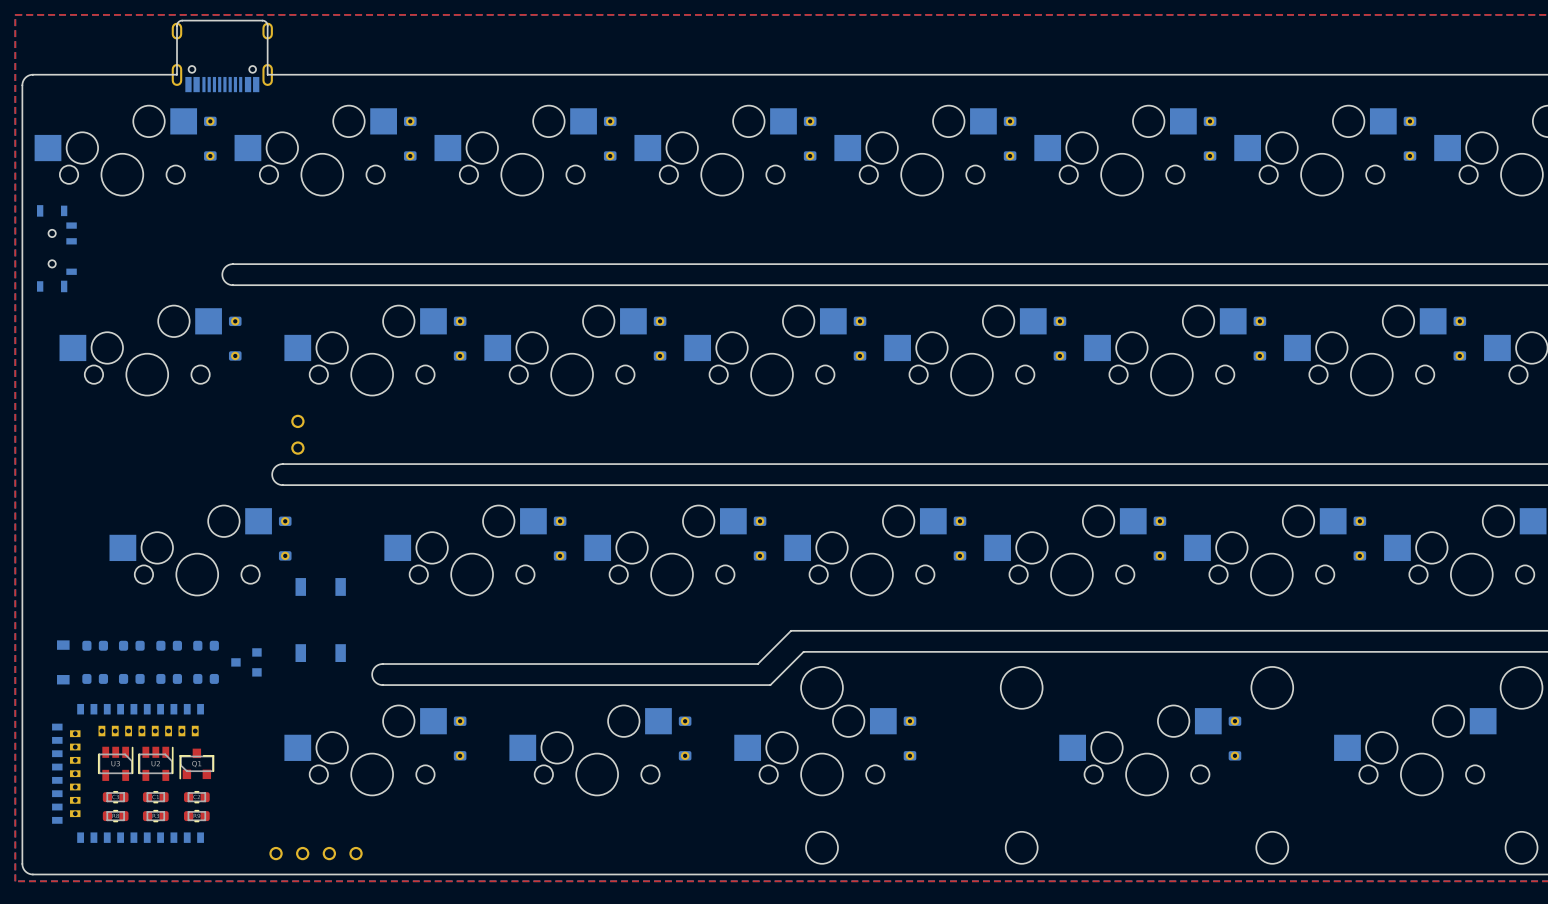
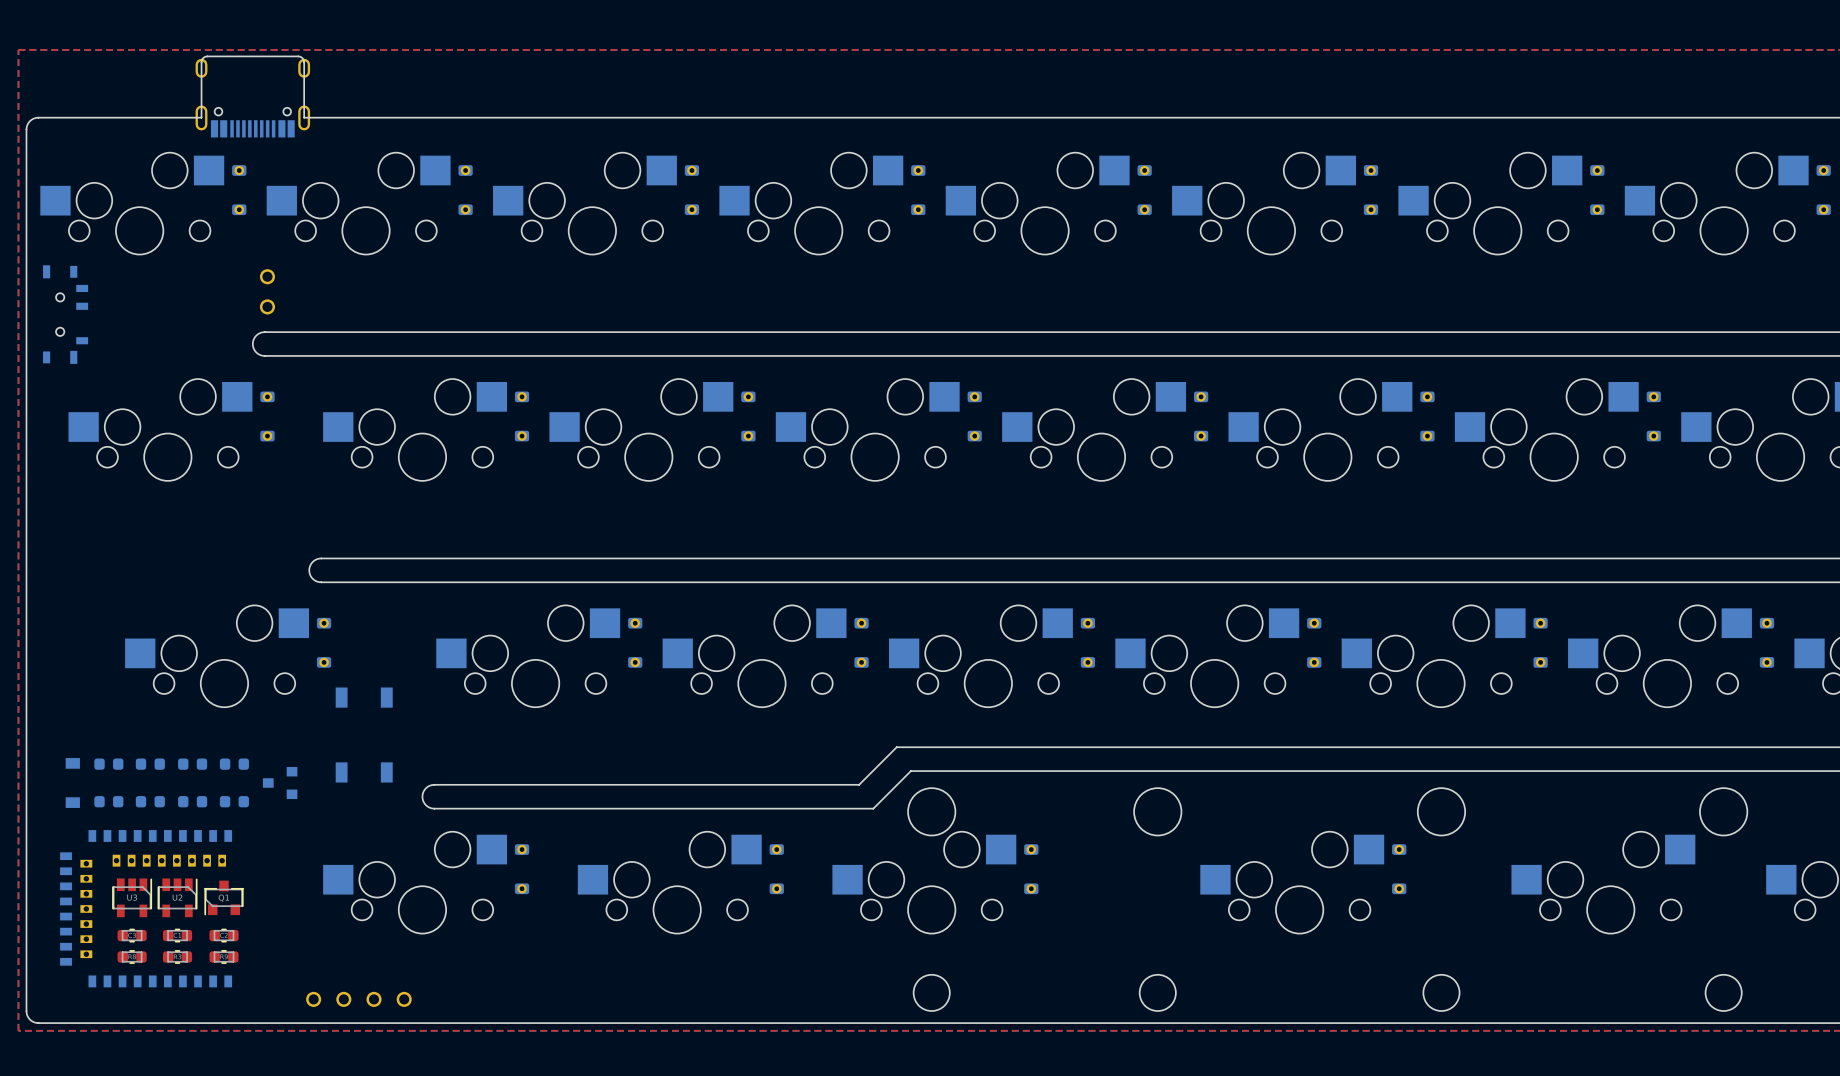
part position: (297, 434) -> (267, 291)

